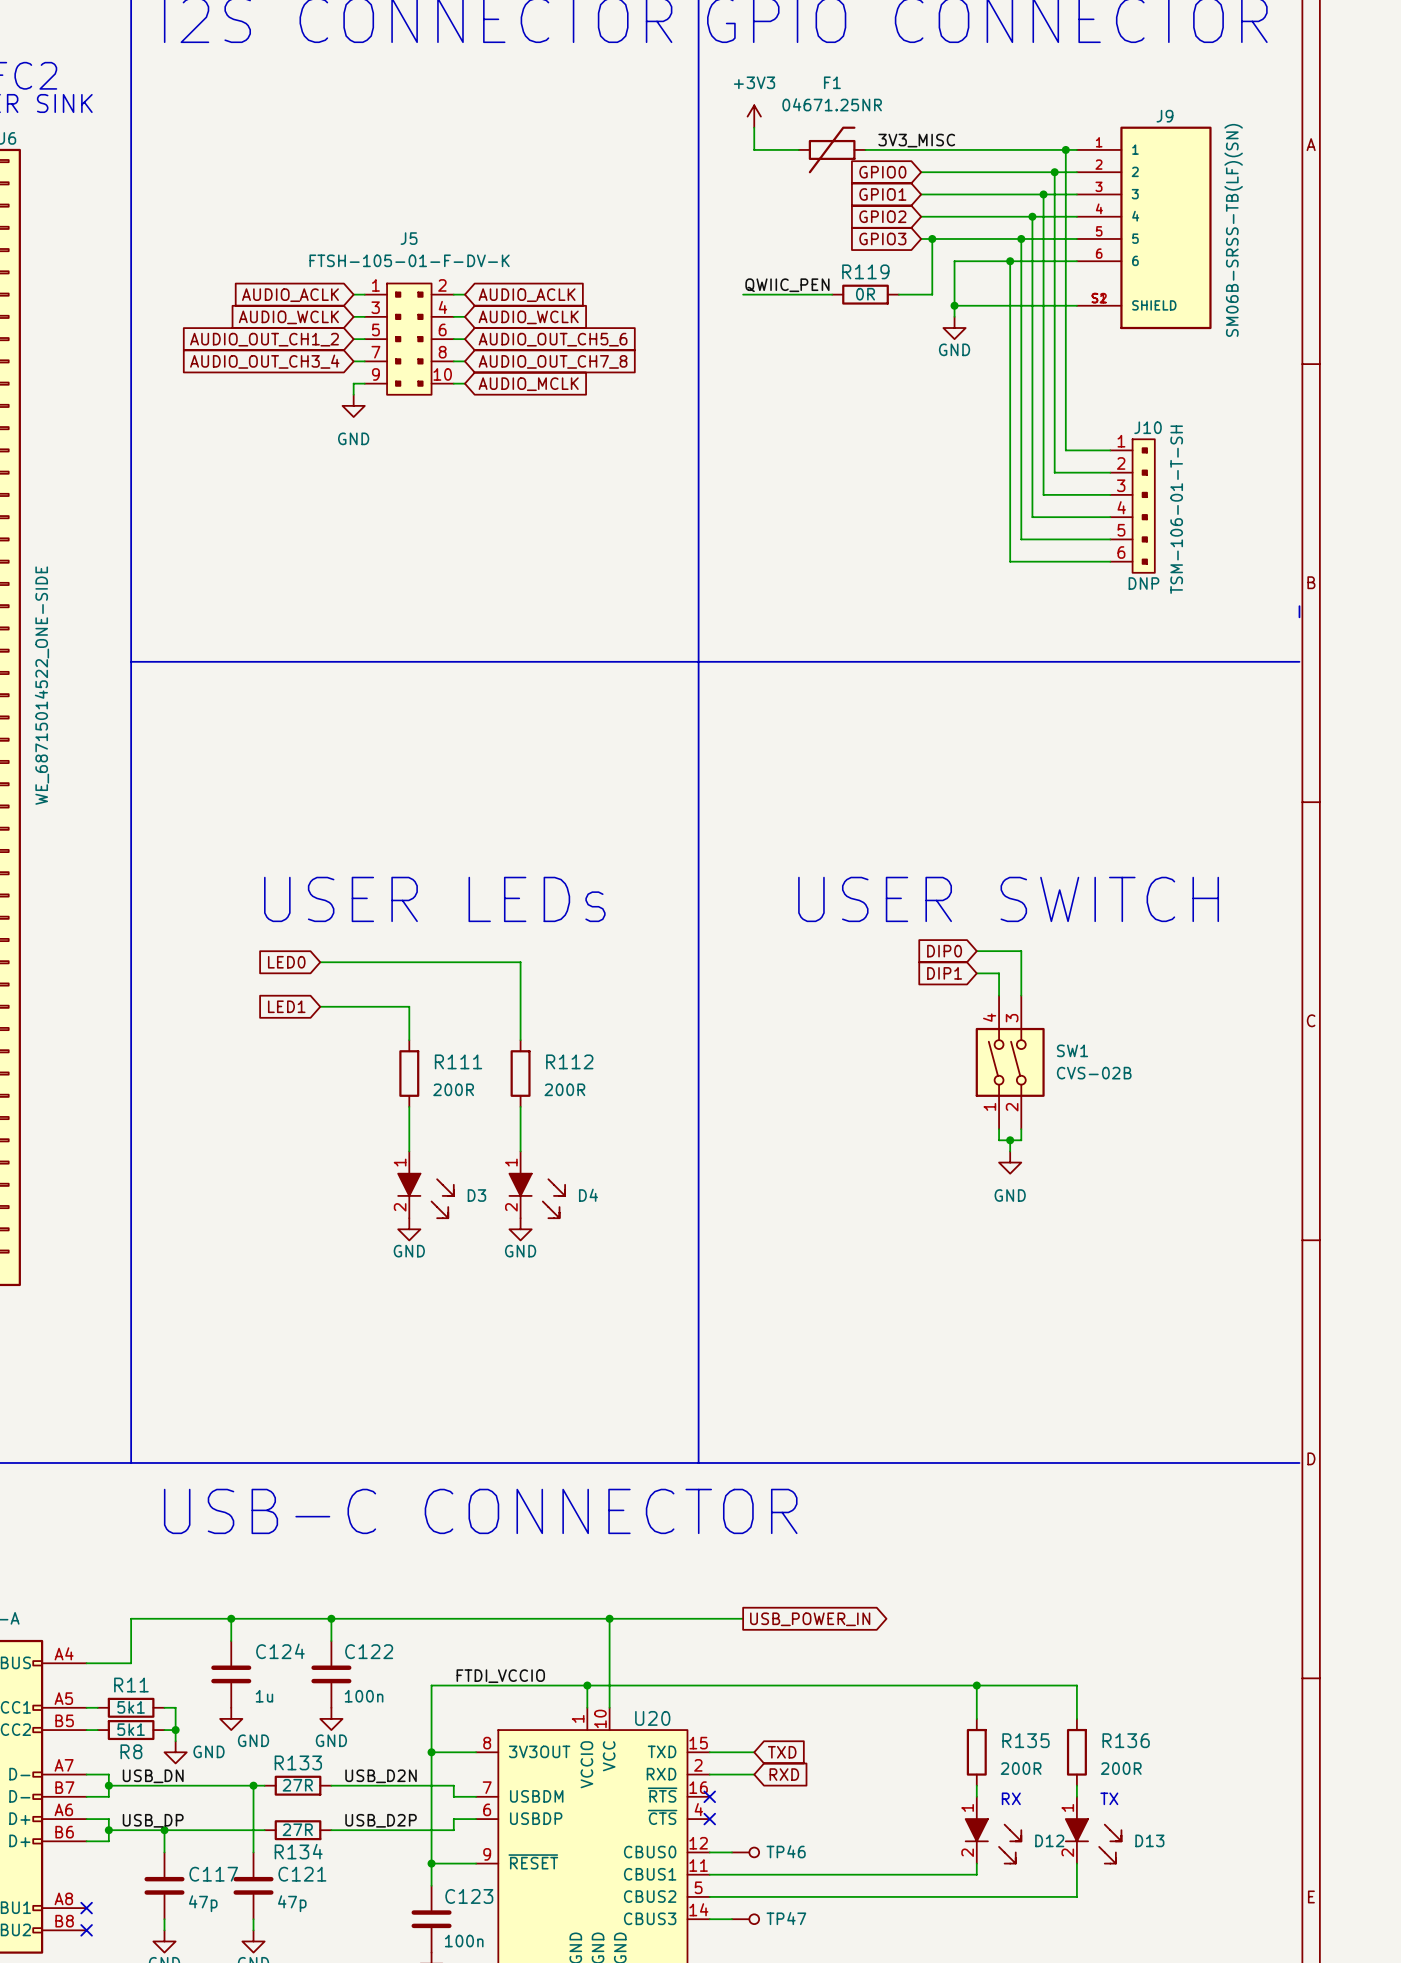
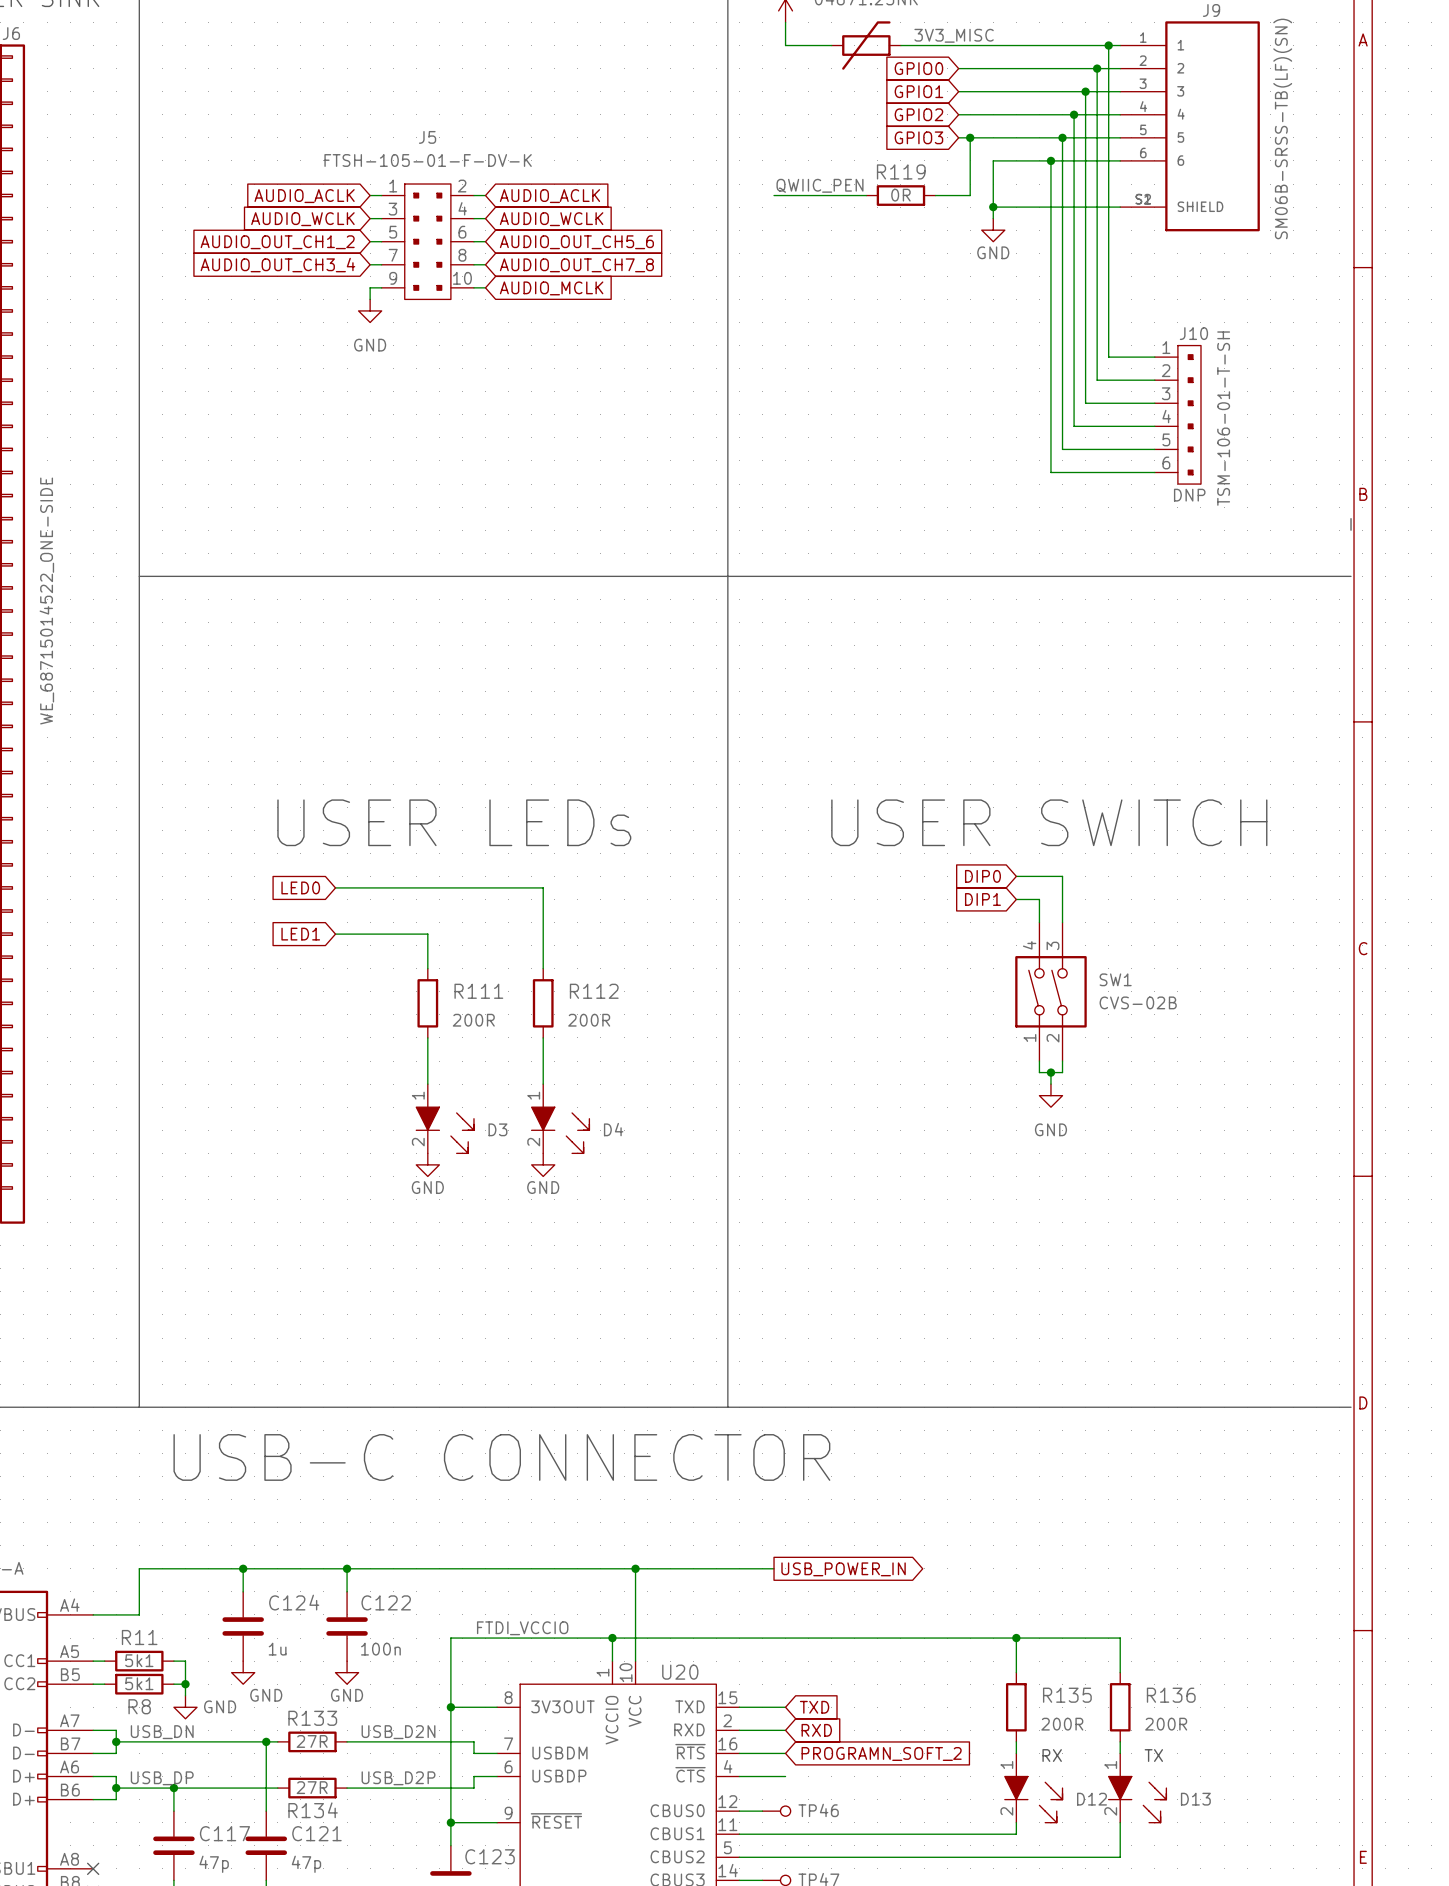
wire: none -> (739, 1753) (785, 1753)
no-connect mark: (709, 1796) -> none
global label: none -> PROGRAMN_SOFT_2 (881, 1753)
wire: none -> (739, 1776) (785, 1776)
no-connect mark: (709, 1819) -> none

